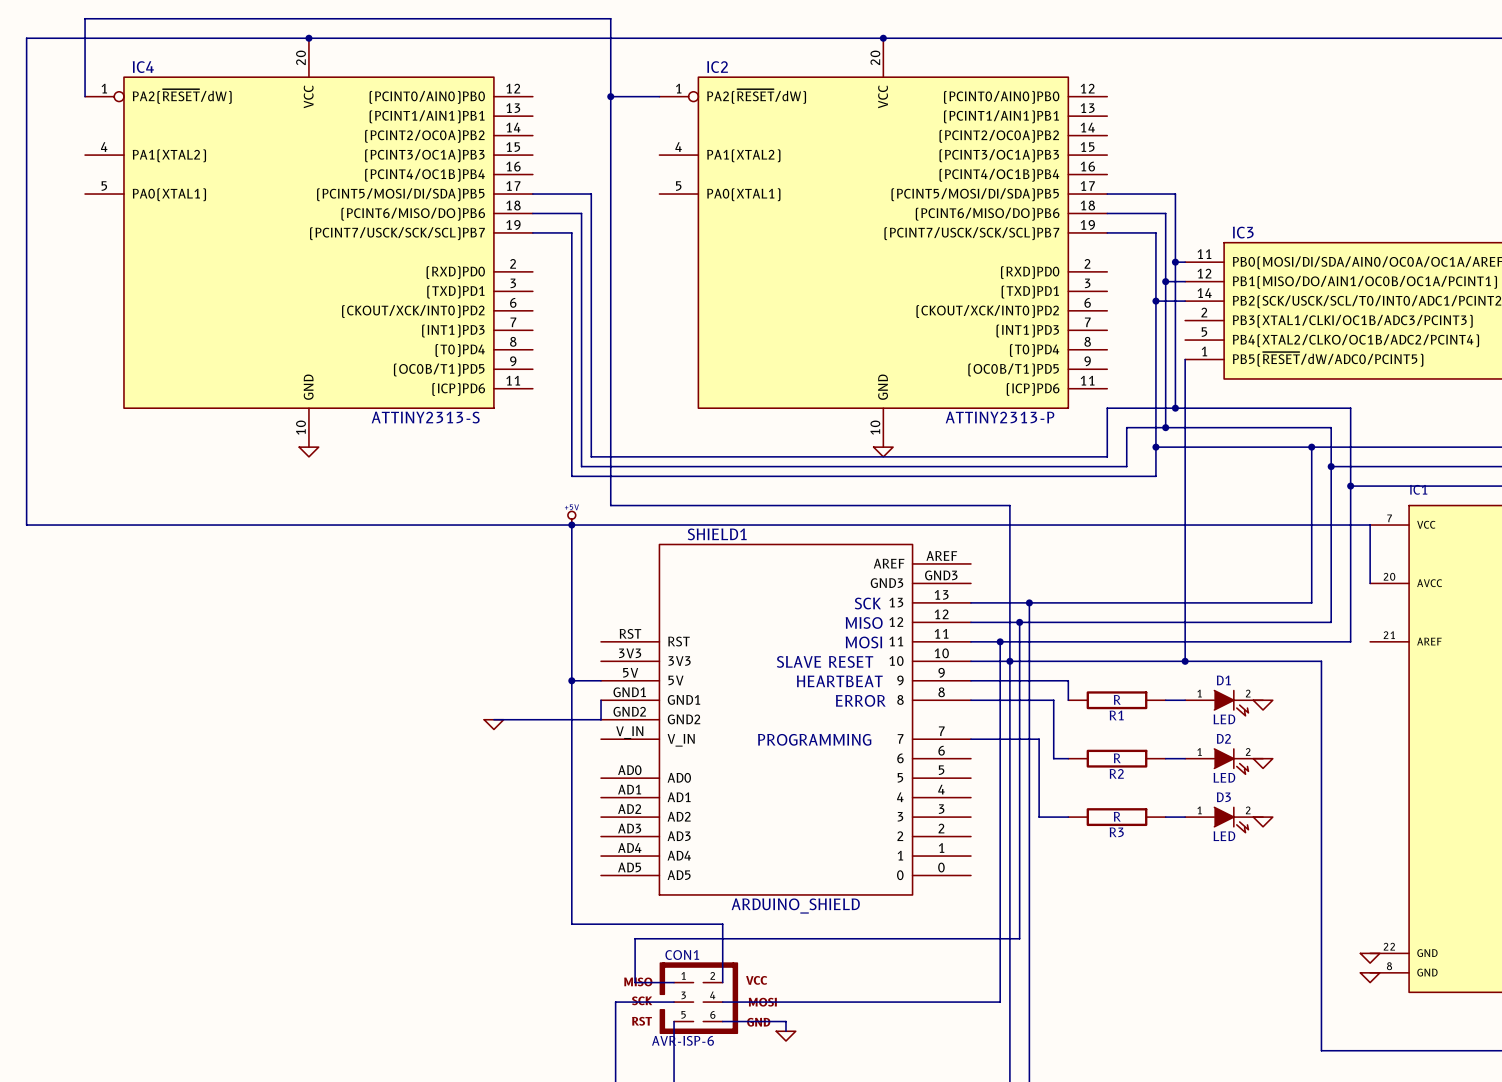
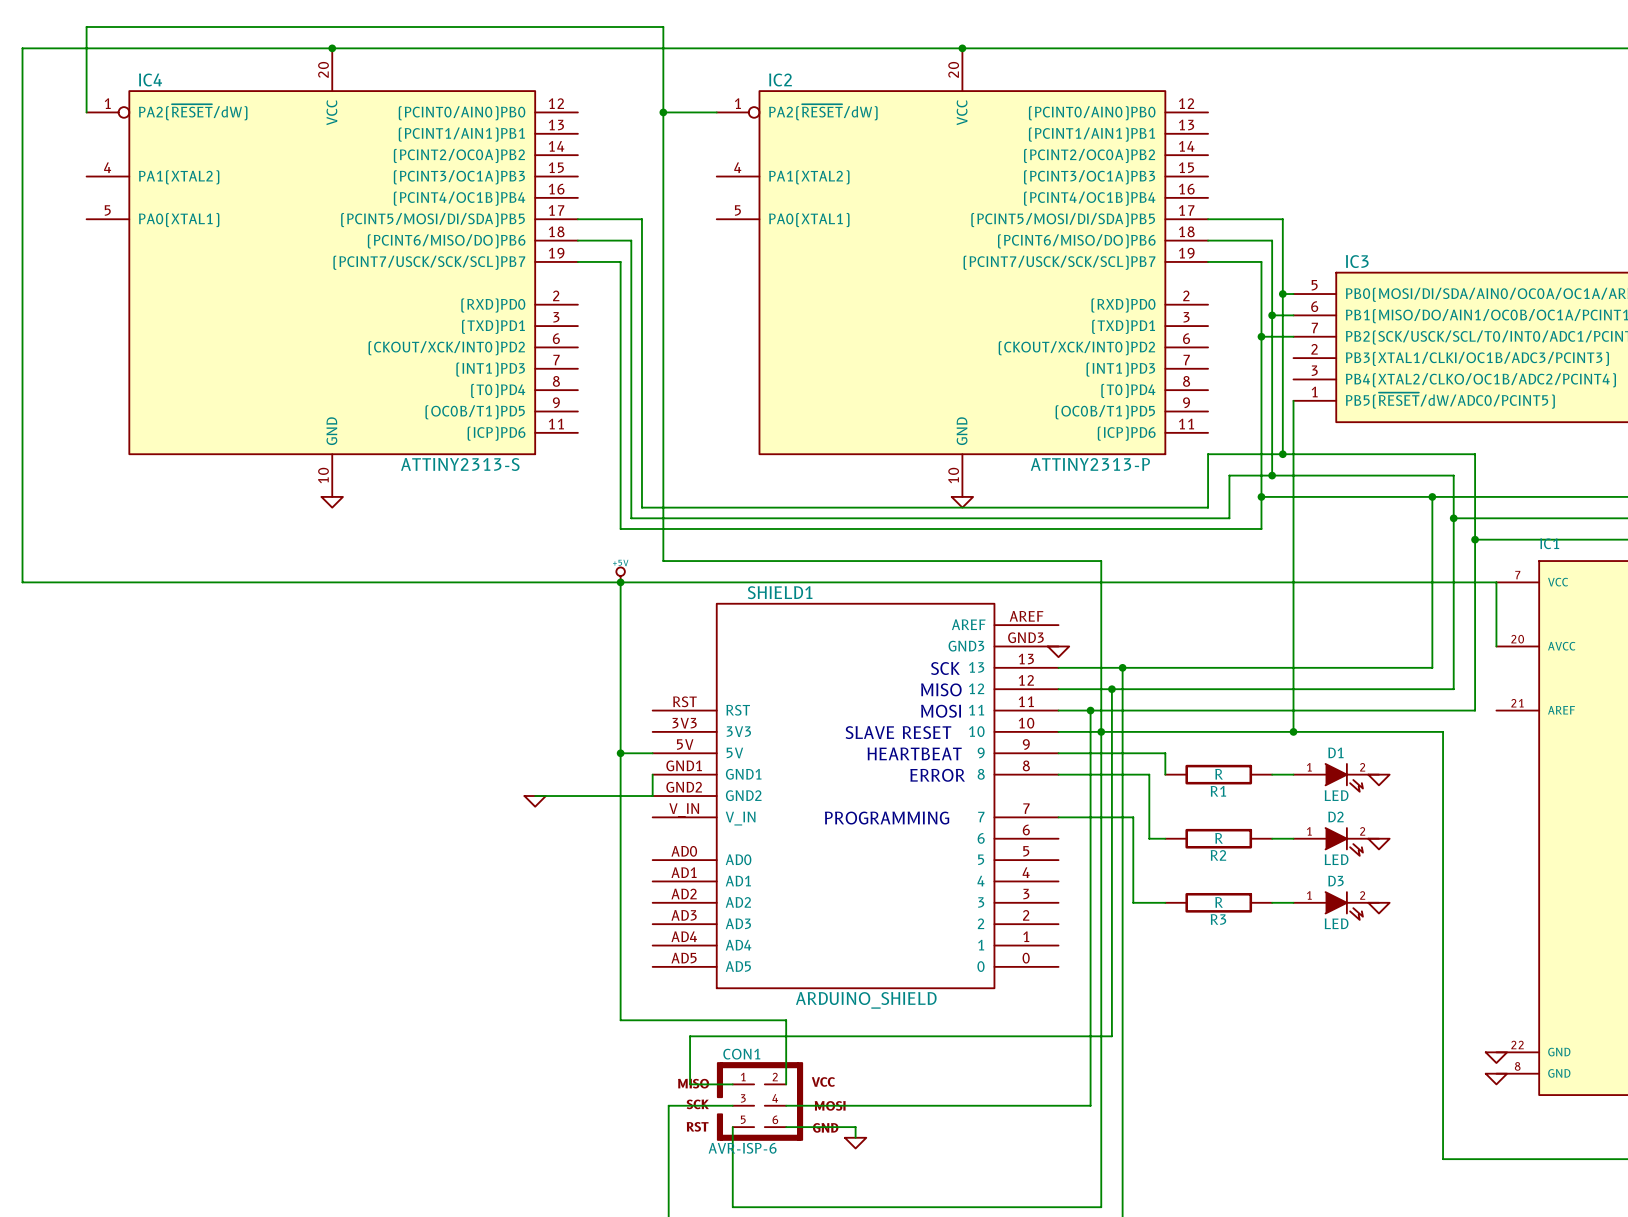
IC3 pin number: 11 (1204, 254) -> 5 (1314, 285)
IC3 pin number: 12 (1204, 273) -> 6 (1314, 306)
IC3 pin number: 14 (1204, 293) -> 7 (1314, 327)
IC3 pin number: 5 (1204, 332) -> 3 (1314, 370)
power symbol: none -> (1058, 651)

